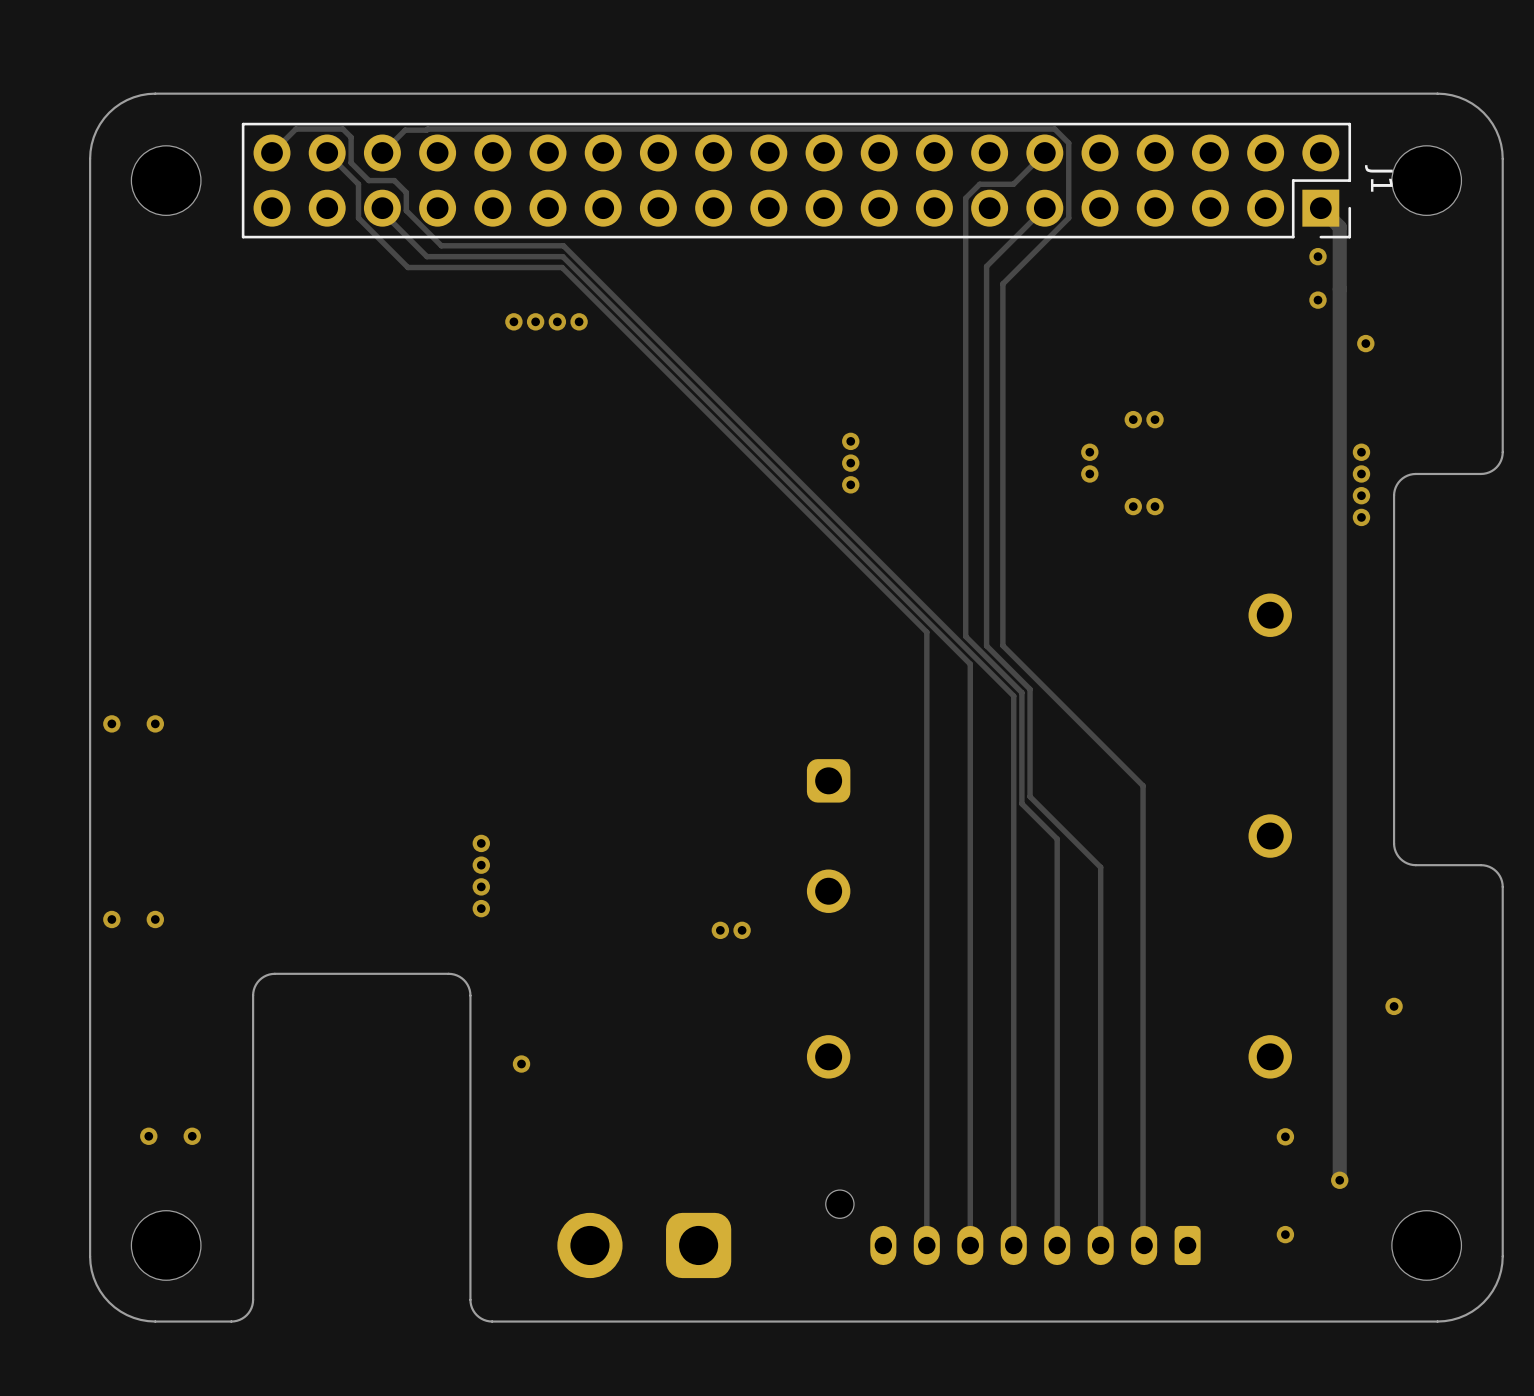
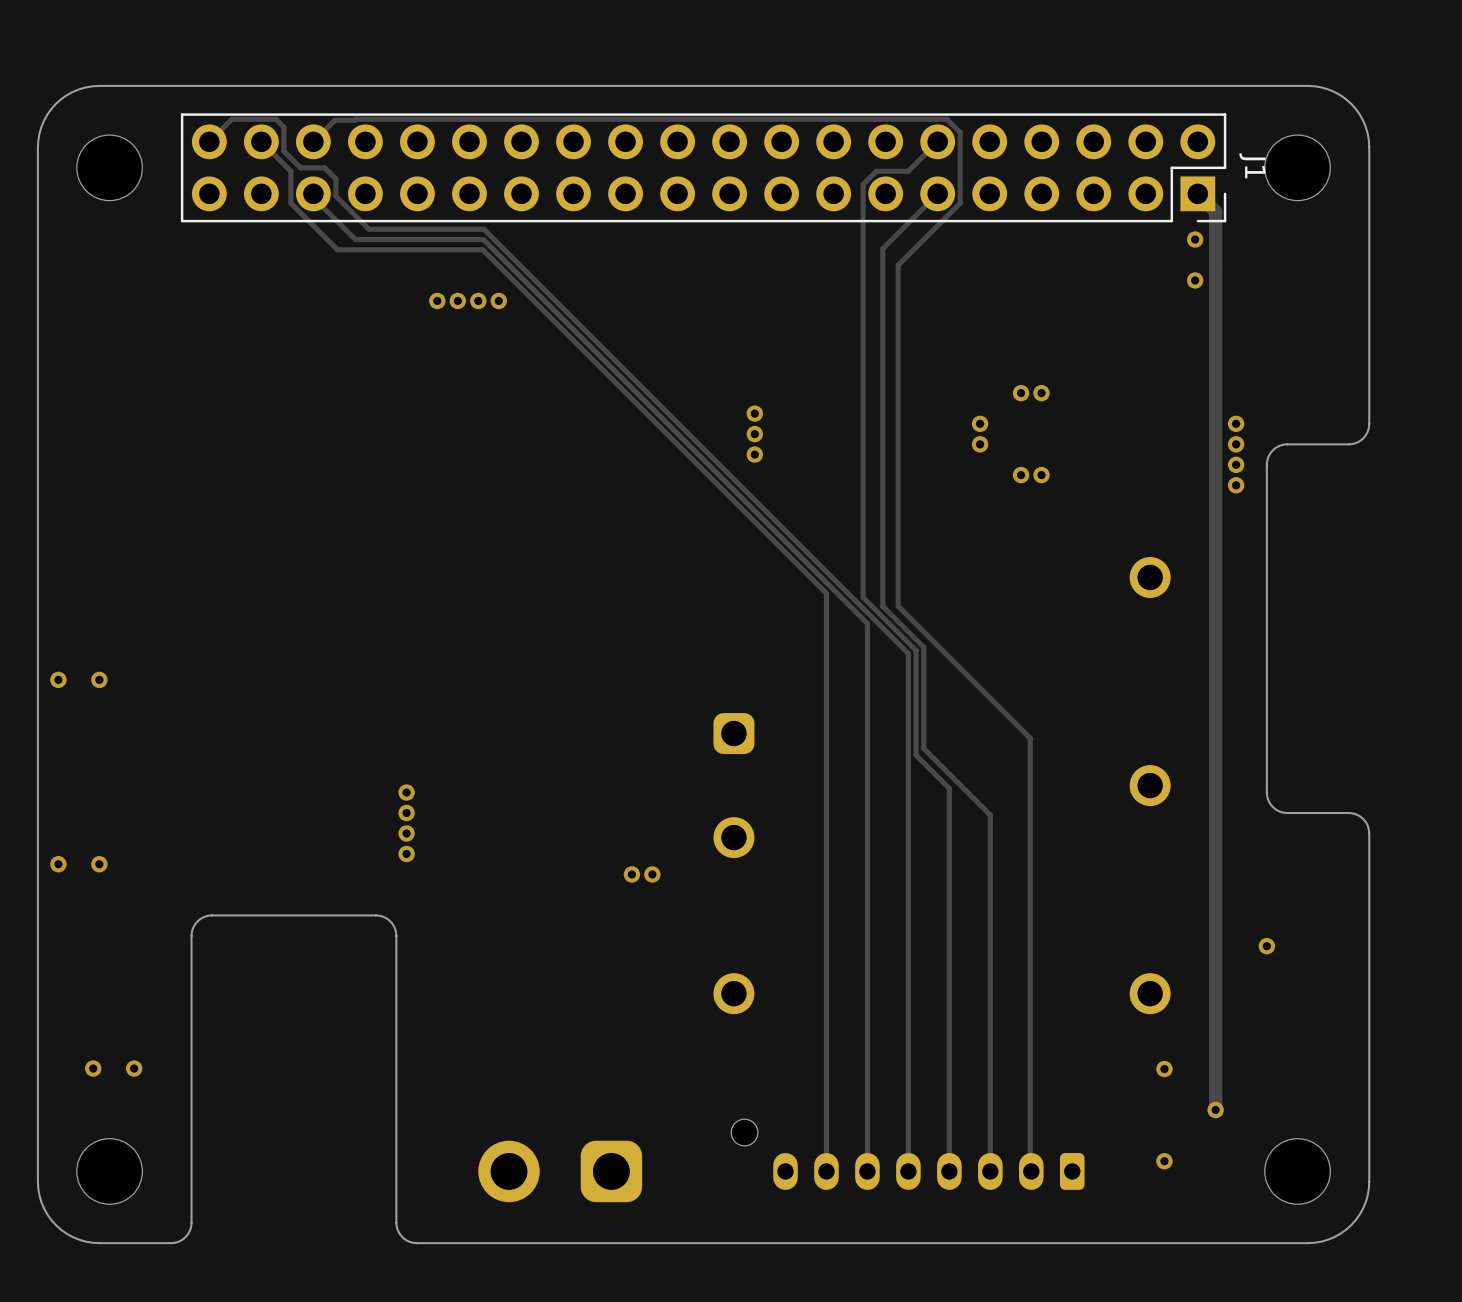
via: (1365, 343) -> none
via: (521, 1064) -> none

